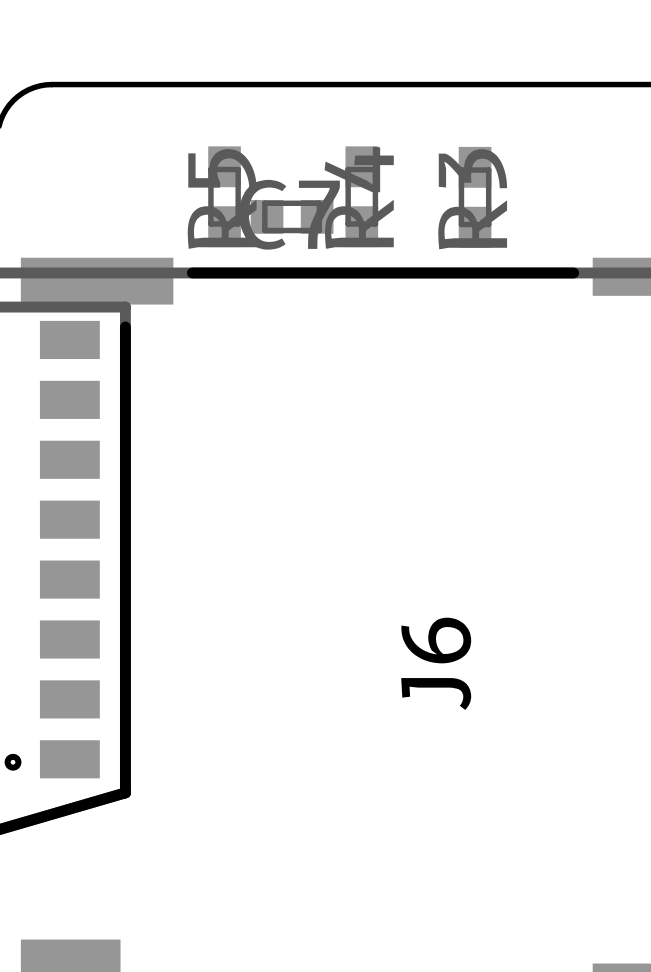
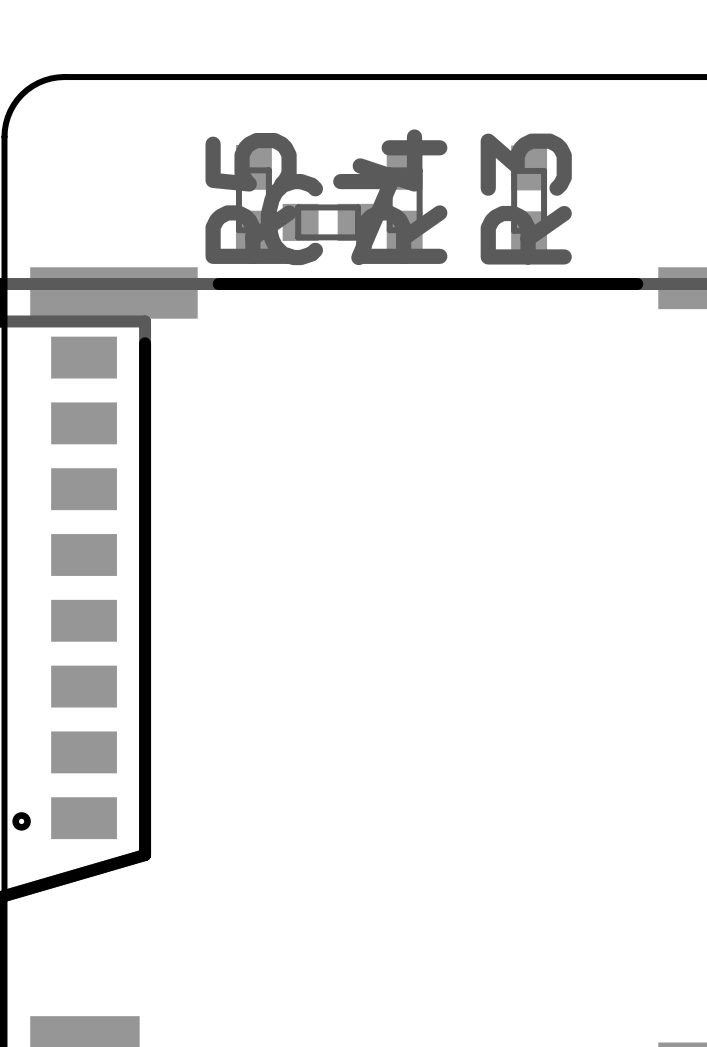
J6 name: J6 (436, 663) -> none

